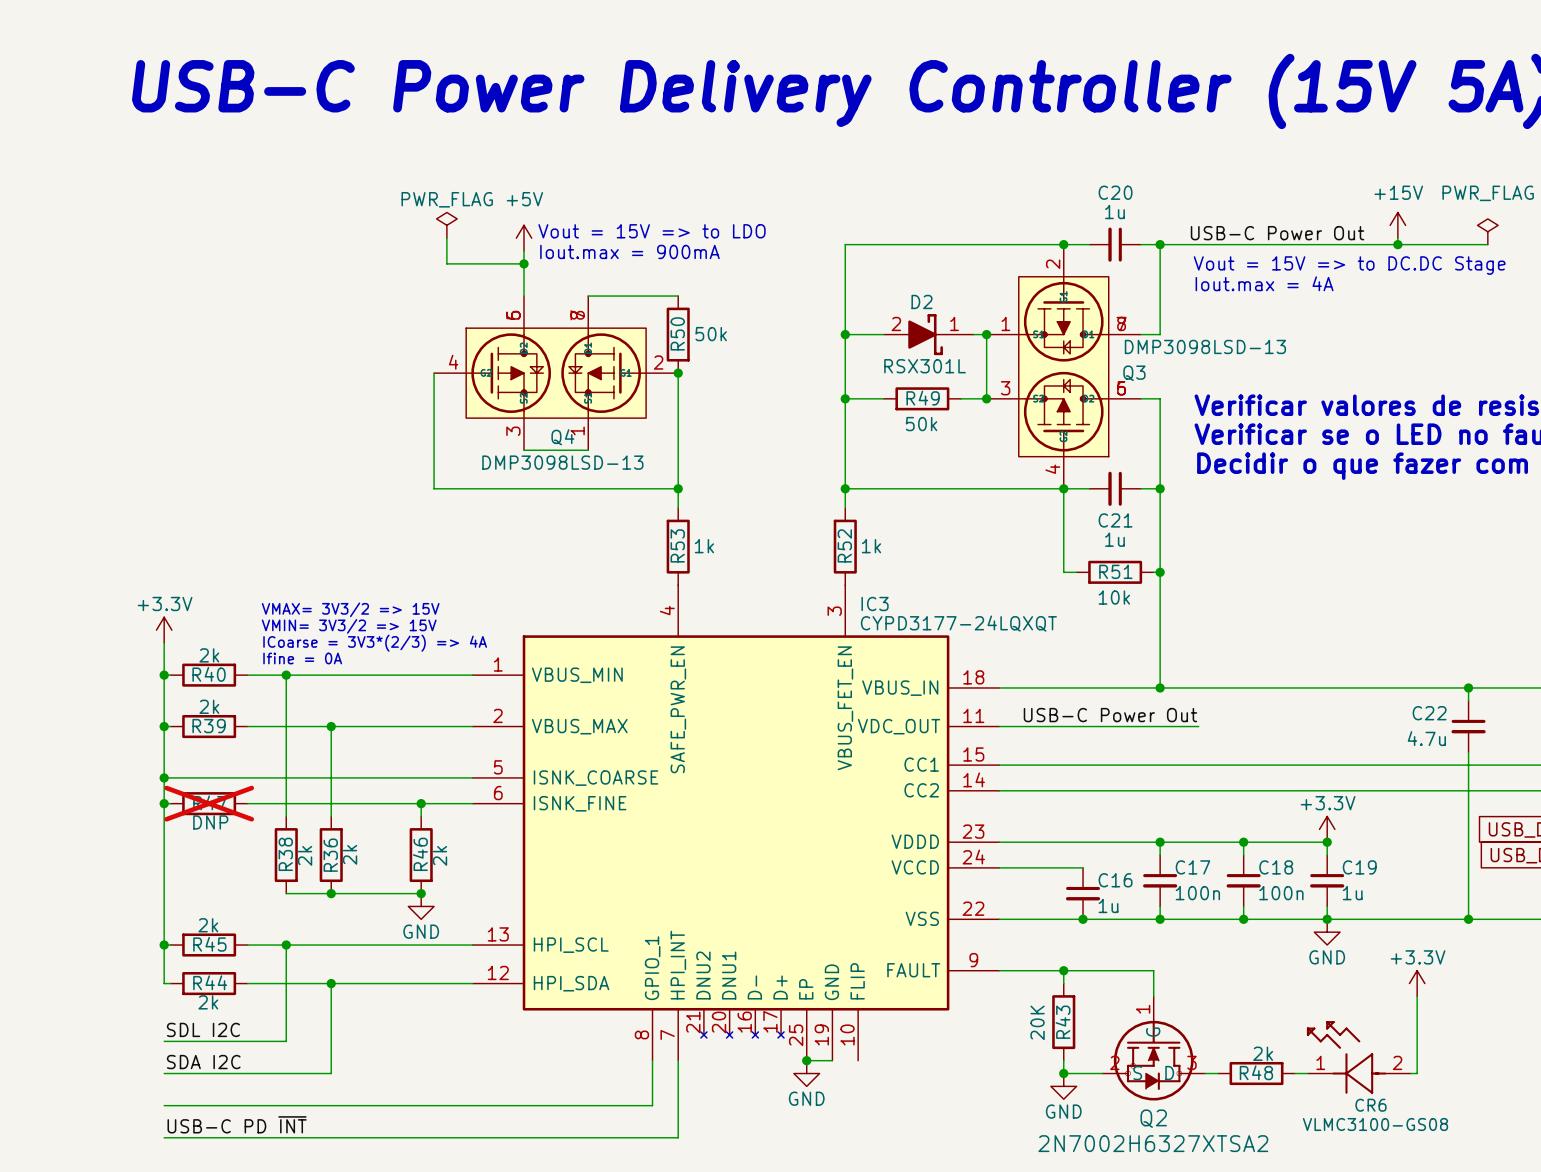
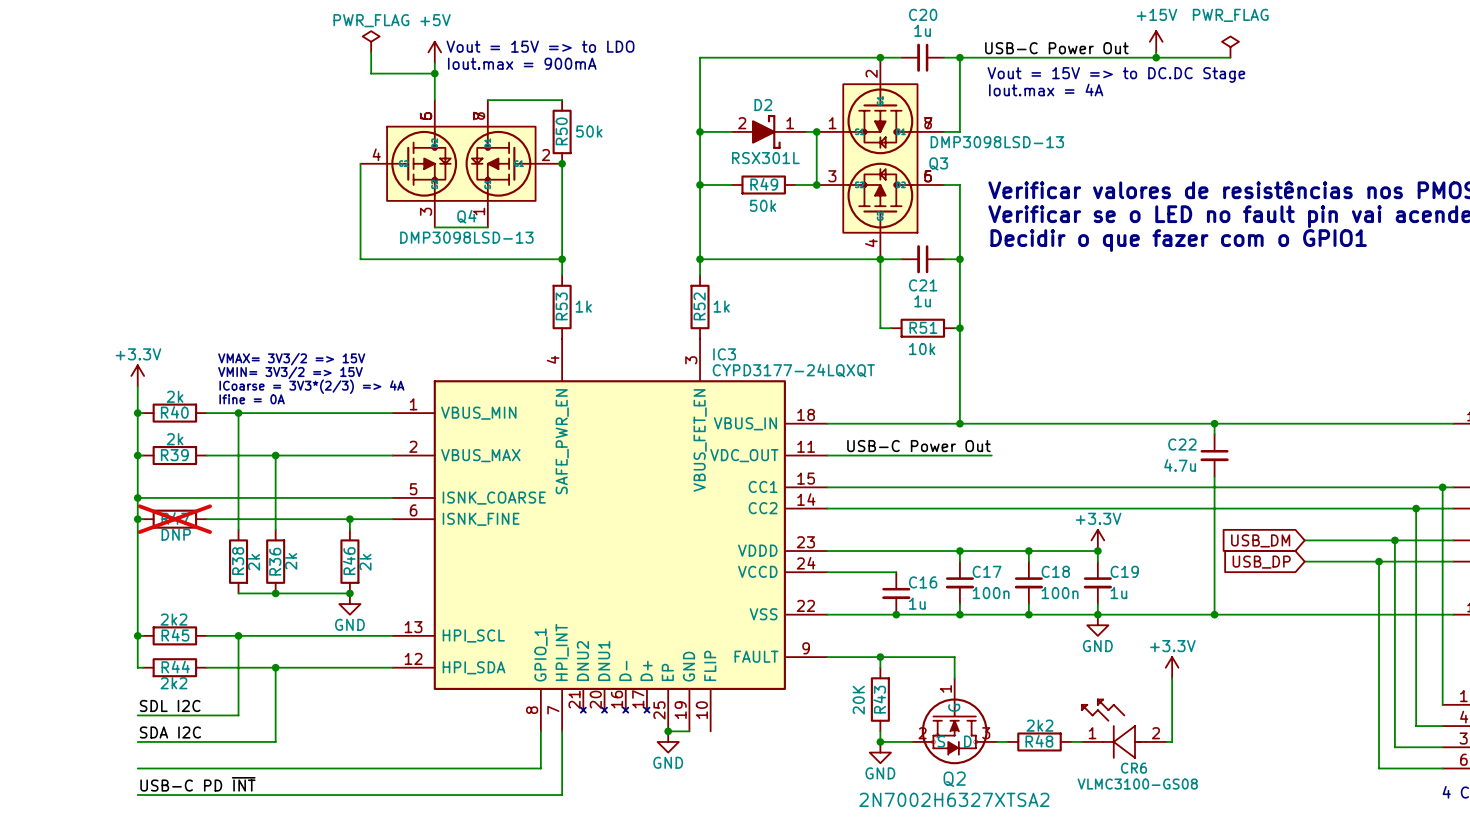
R45 value: 2k (208, 925) -> 2k2 (173, 619)
R44 value: 2k (208, 1002) -> 2k2 (173, 683)
R48 value: 2k (1263, 1053) -> 2k2 (1039, 725)

